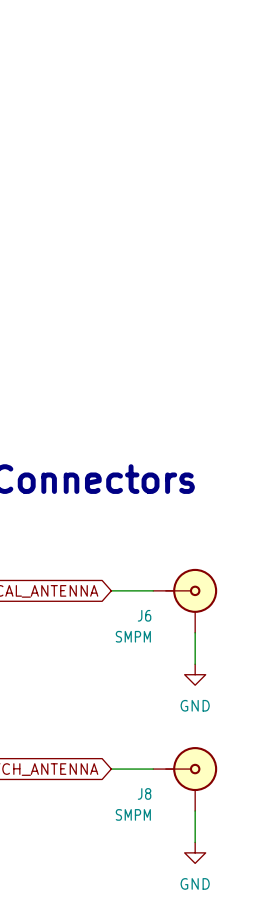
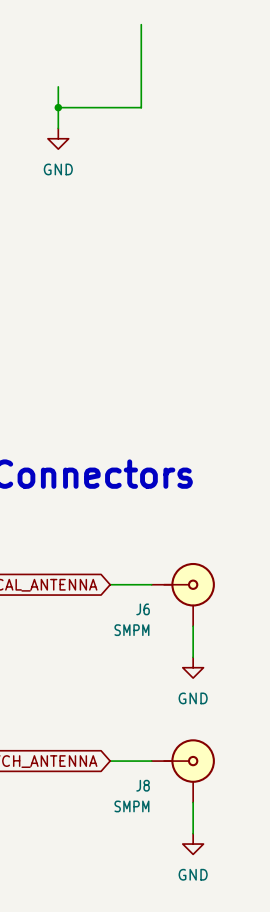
wire: none -> (141, 24) (141, 107) (58, 107)
wire: none -> (58, 86) (58, 128)
junction: none -> (58, 107)
power symbol: none -> GND (58, 138)

